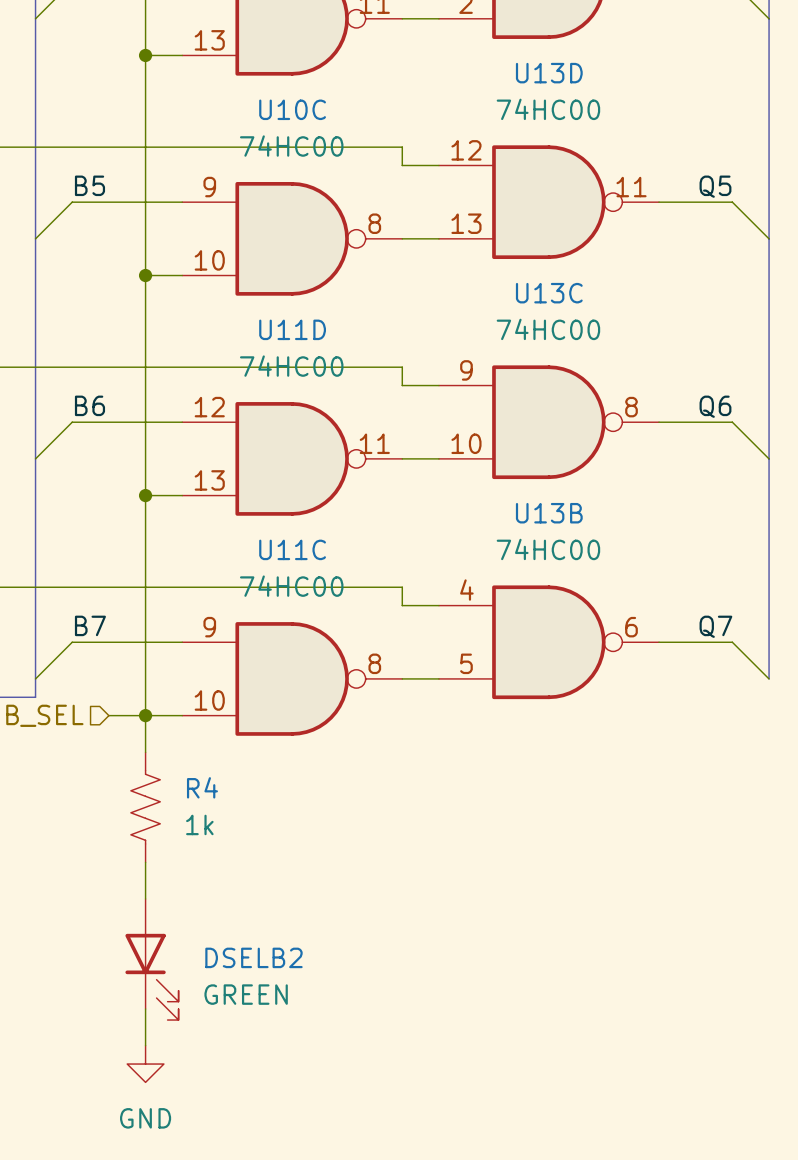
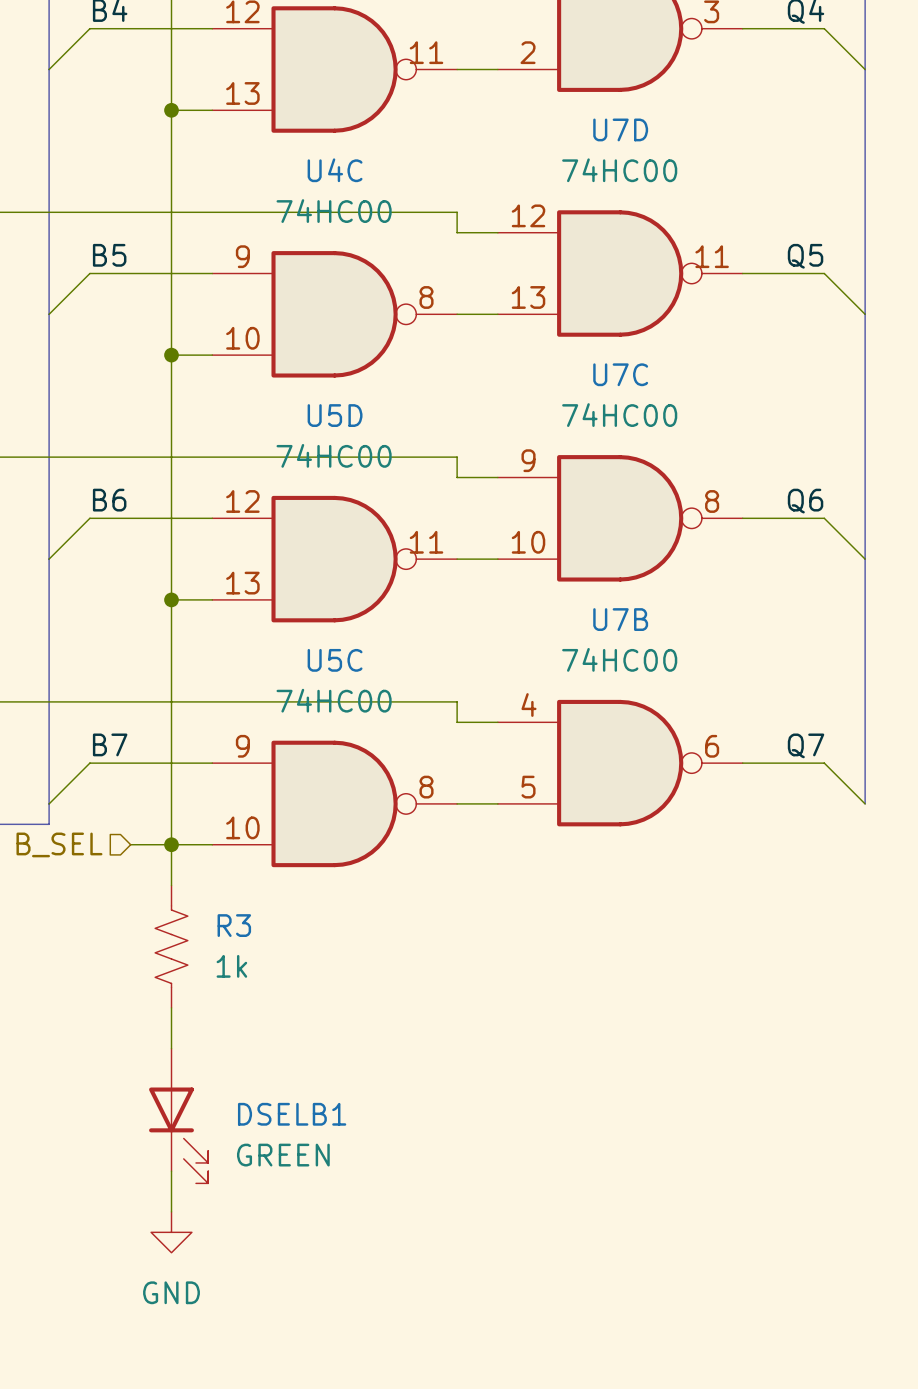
U13D name: U13D (549, 73) -> U7D (620, 129)
U10C name: U10C (292, 109) -> U4C (335, 170)
U13C name: U13C (549, 293) -> U7C (620, 374)
U11D name: U11D (292, 329) -> U5D (335, 415)
U13B name: U13B (549, 513) -> U7B (620, 619)
U11C name: U11C (292, 549) -> U5C (335, 660)
R4 name: R4 (202, 787) -> R3 (234, 925)
DSELB2 name: DSELB2 (253, 957) -> DSELB1 (292, 1114)

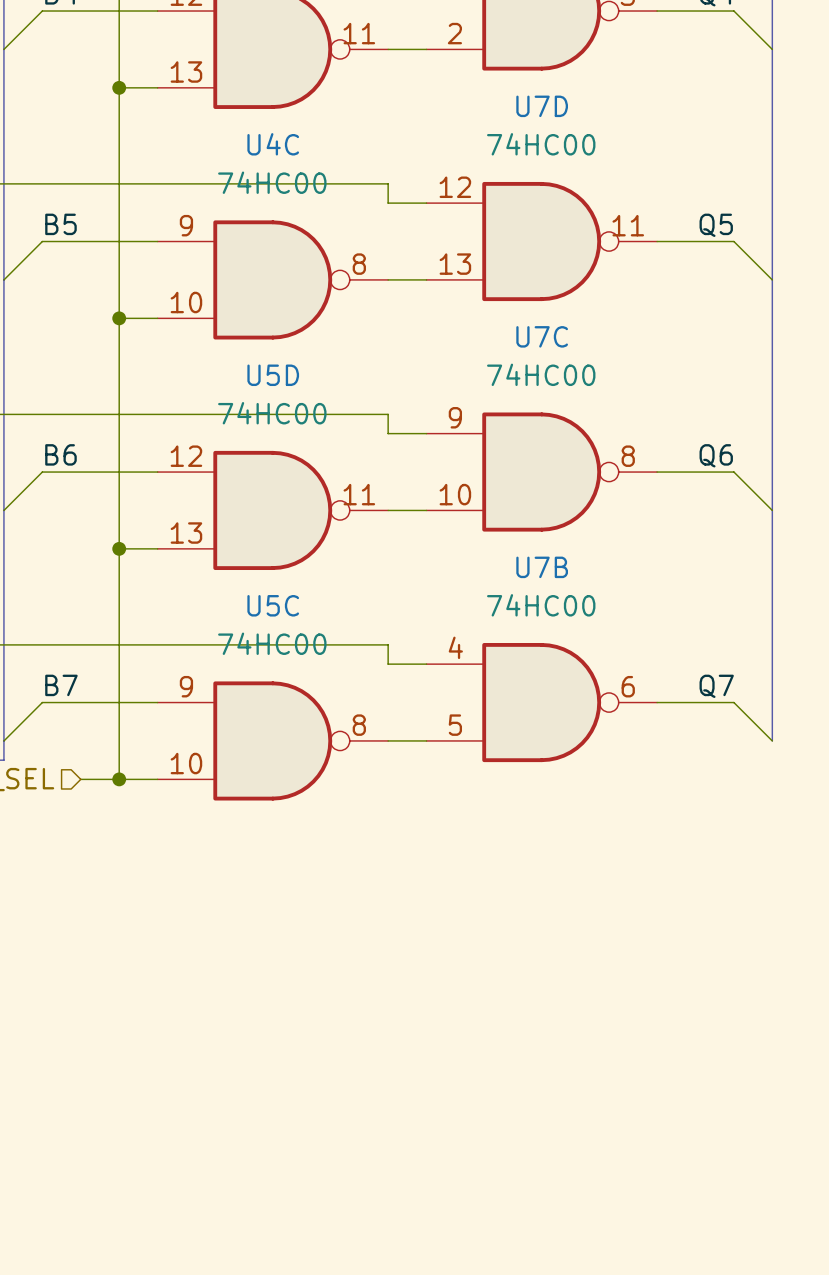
wire: (171, 844) (171, 885) -> none
R3: 1k (171, 946) -> none
wire: (171, 1007) (171, 1048) -> none
DSELB1: GREEN (178, 1116) -> none
wire: (171, 1171) (171, 1211) -> none
power symbol: GND (171, 1232) -> none

